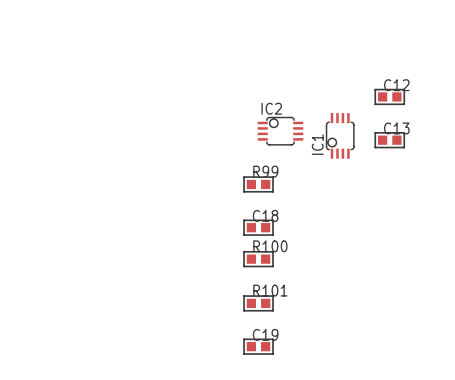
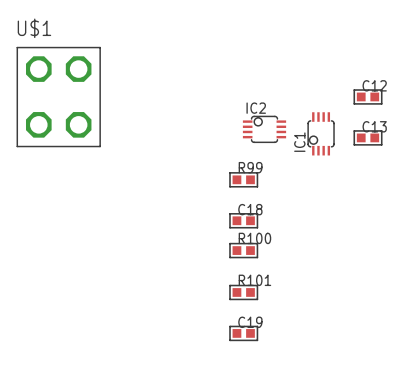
U$1: none -> (58, 97)

